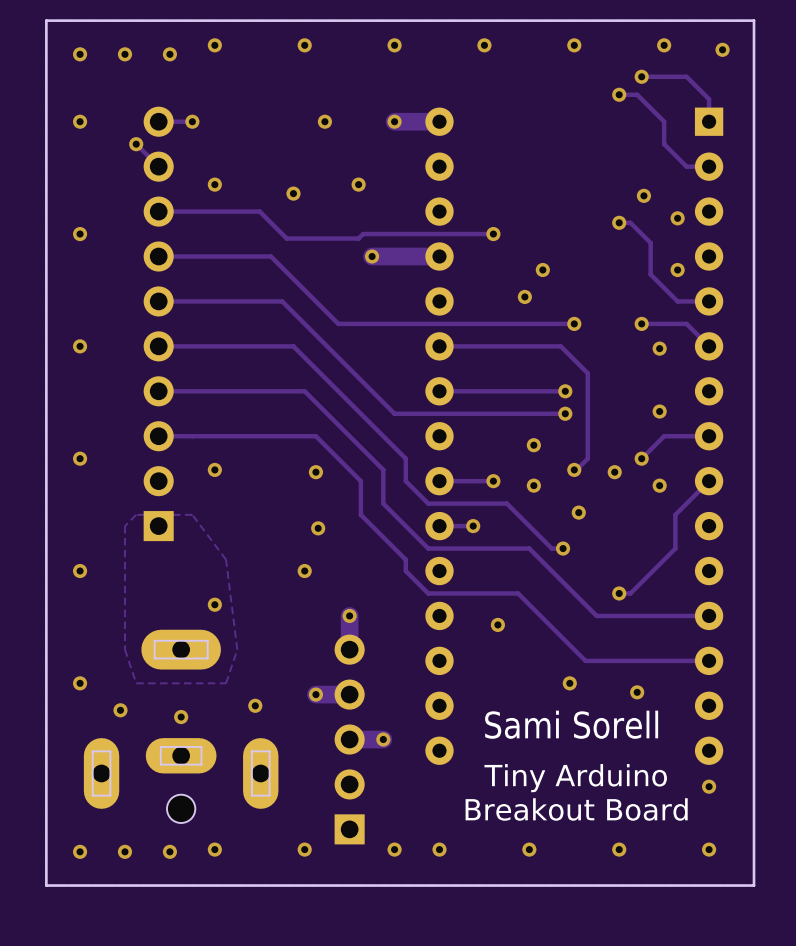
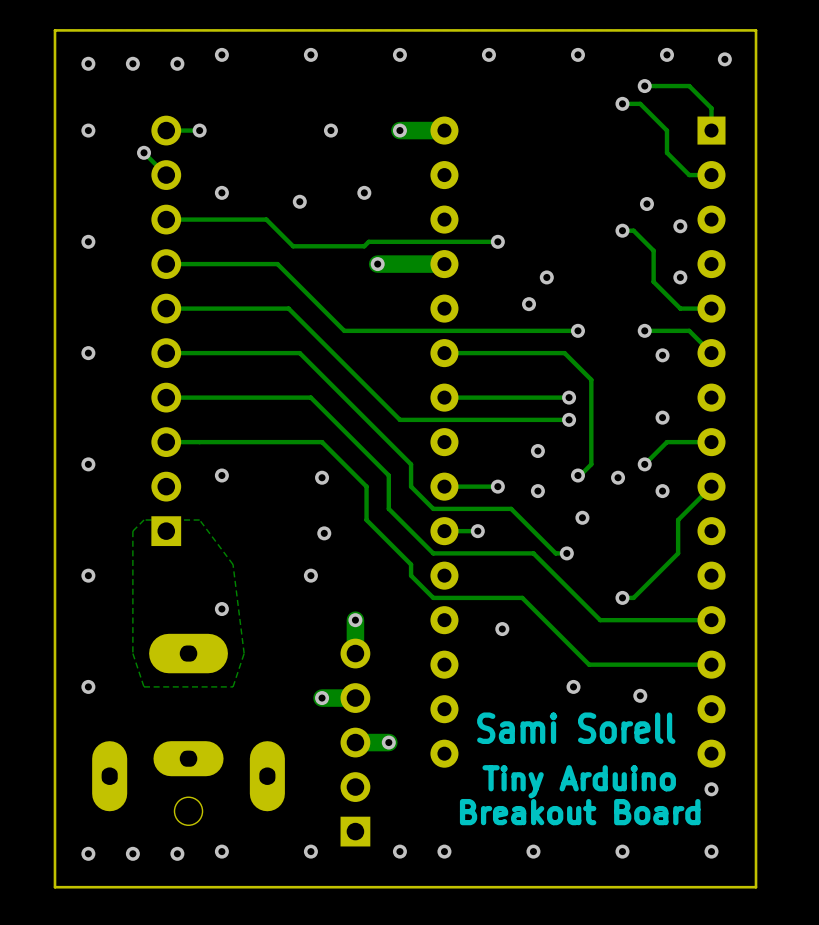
via: (255, 705) -> none
via: (120, 710) -> none
via: (181, 717) -> none

